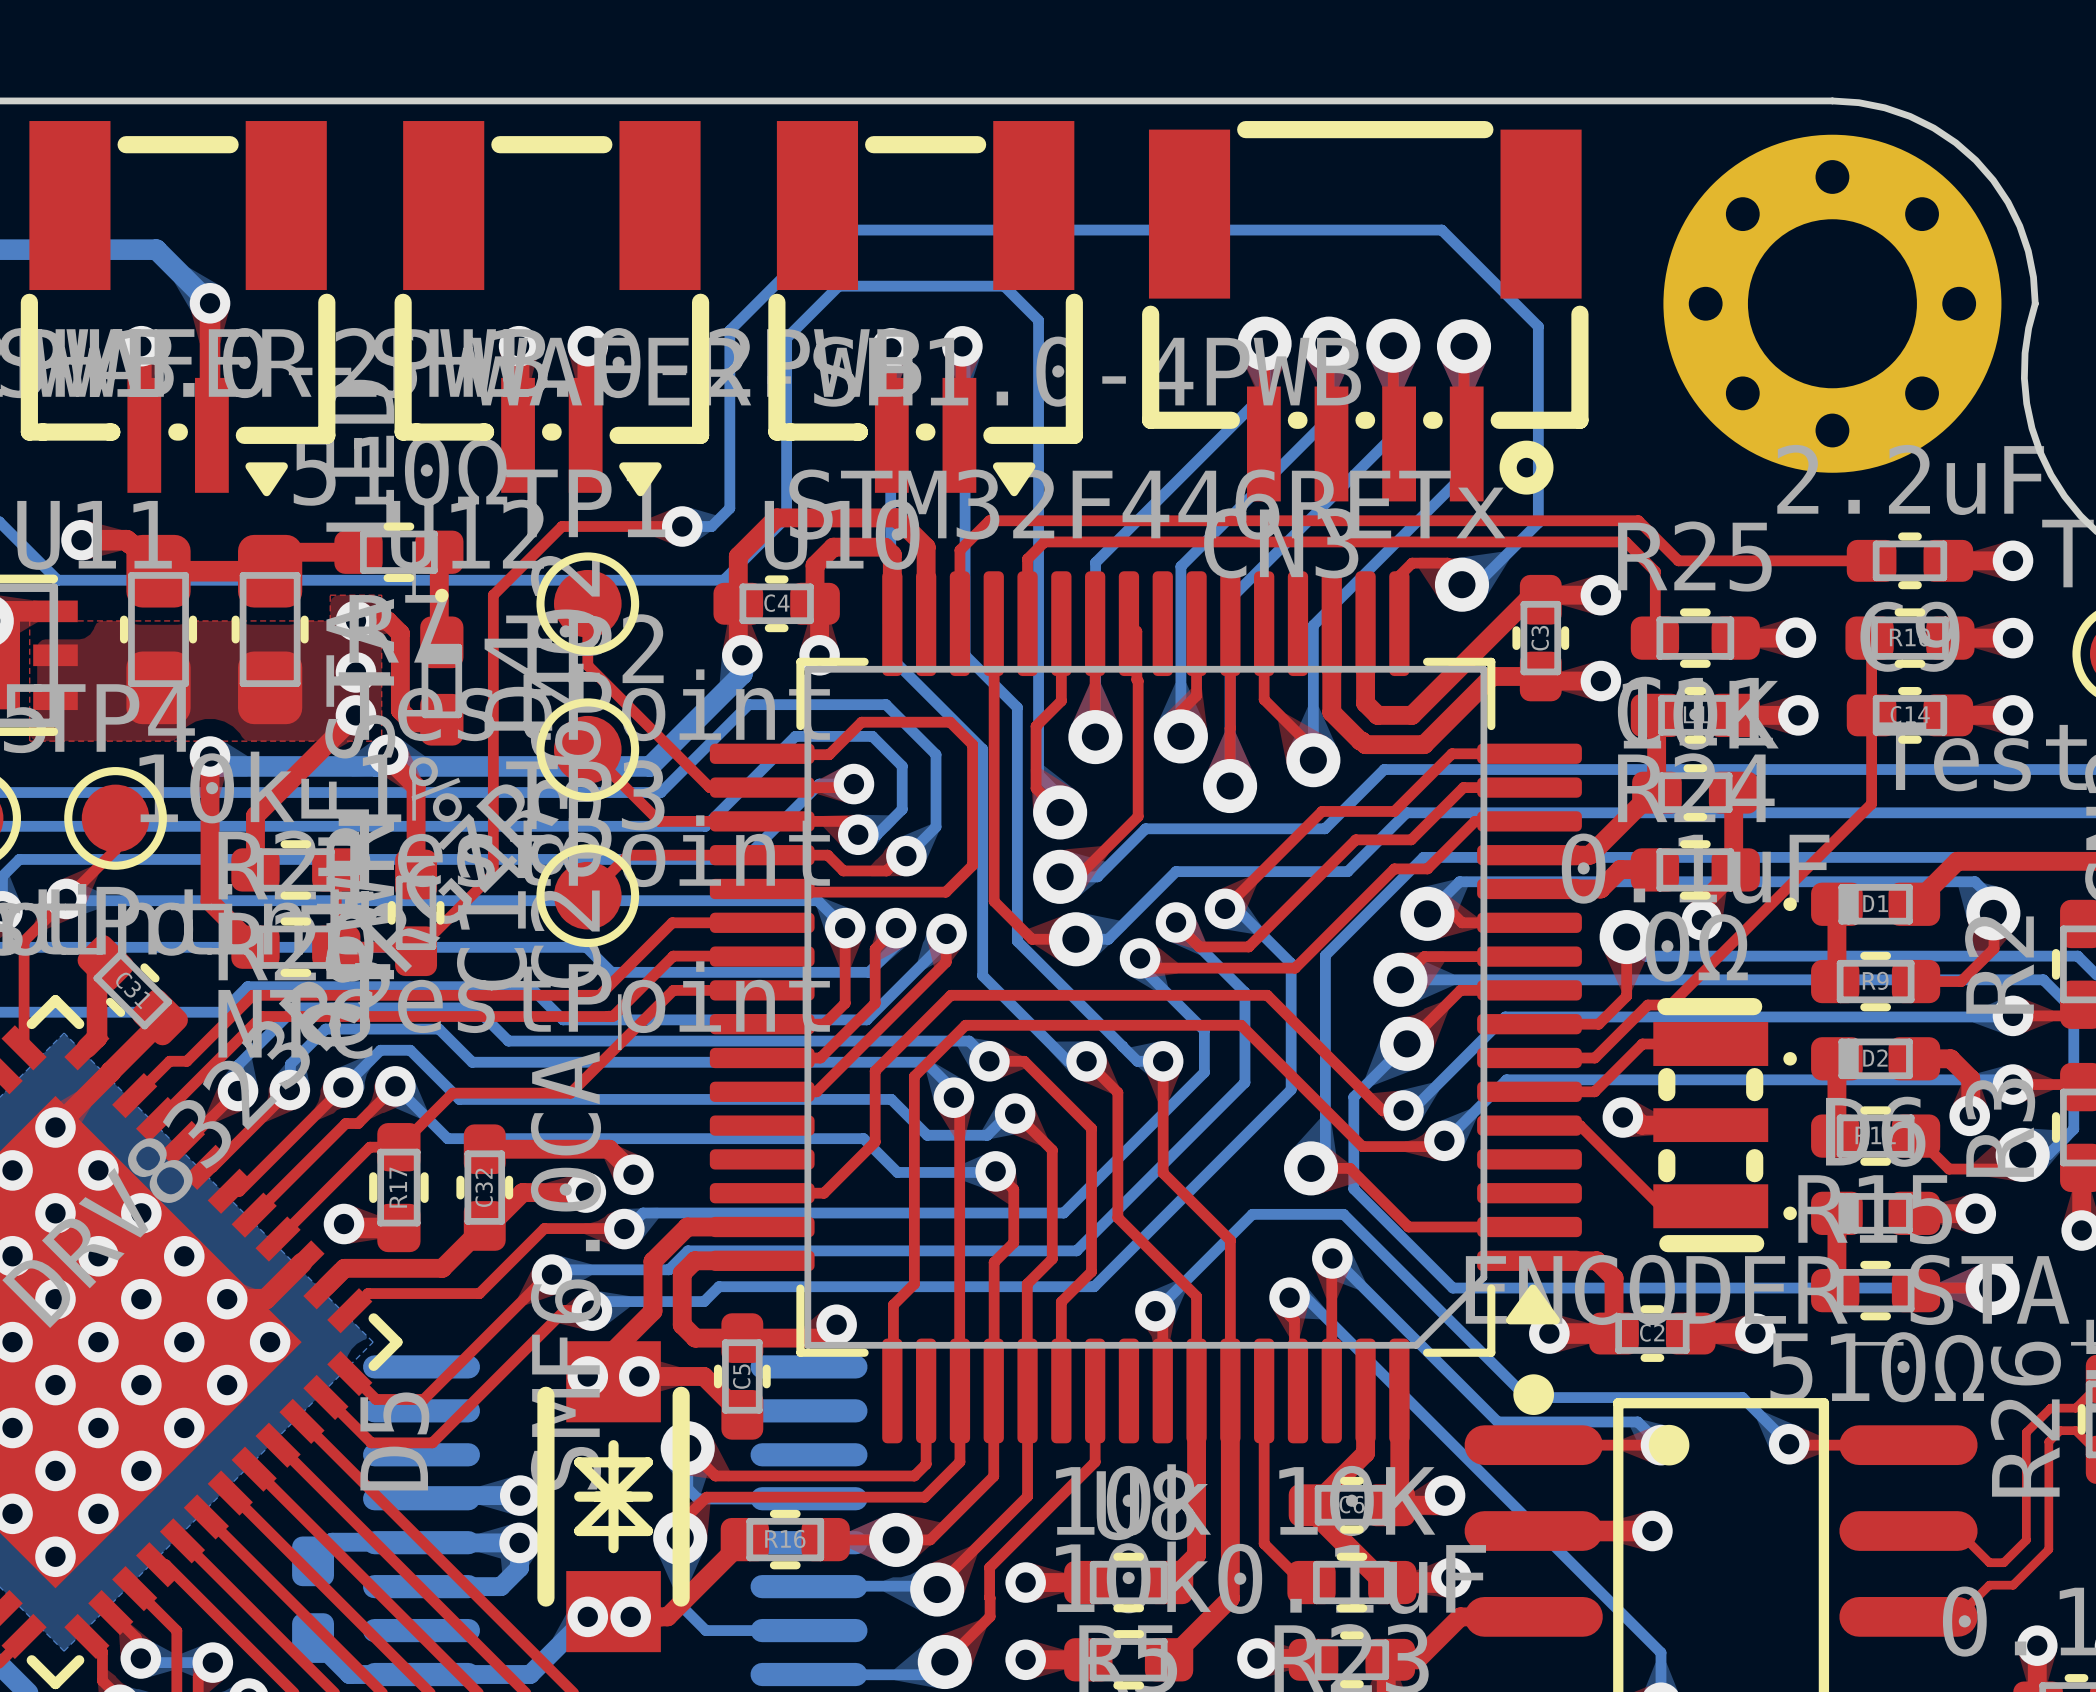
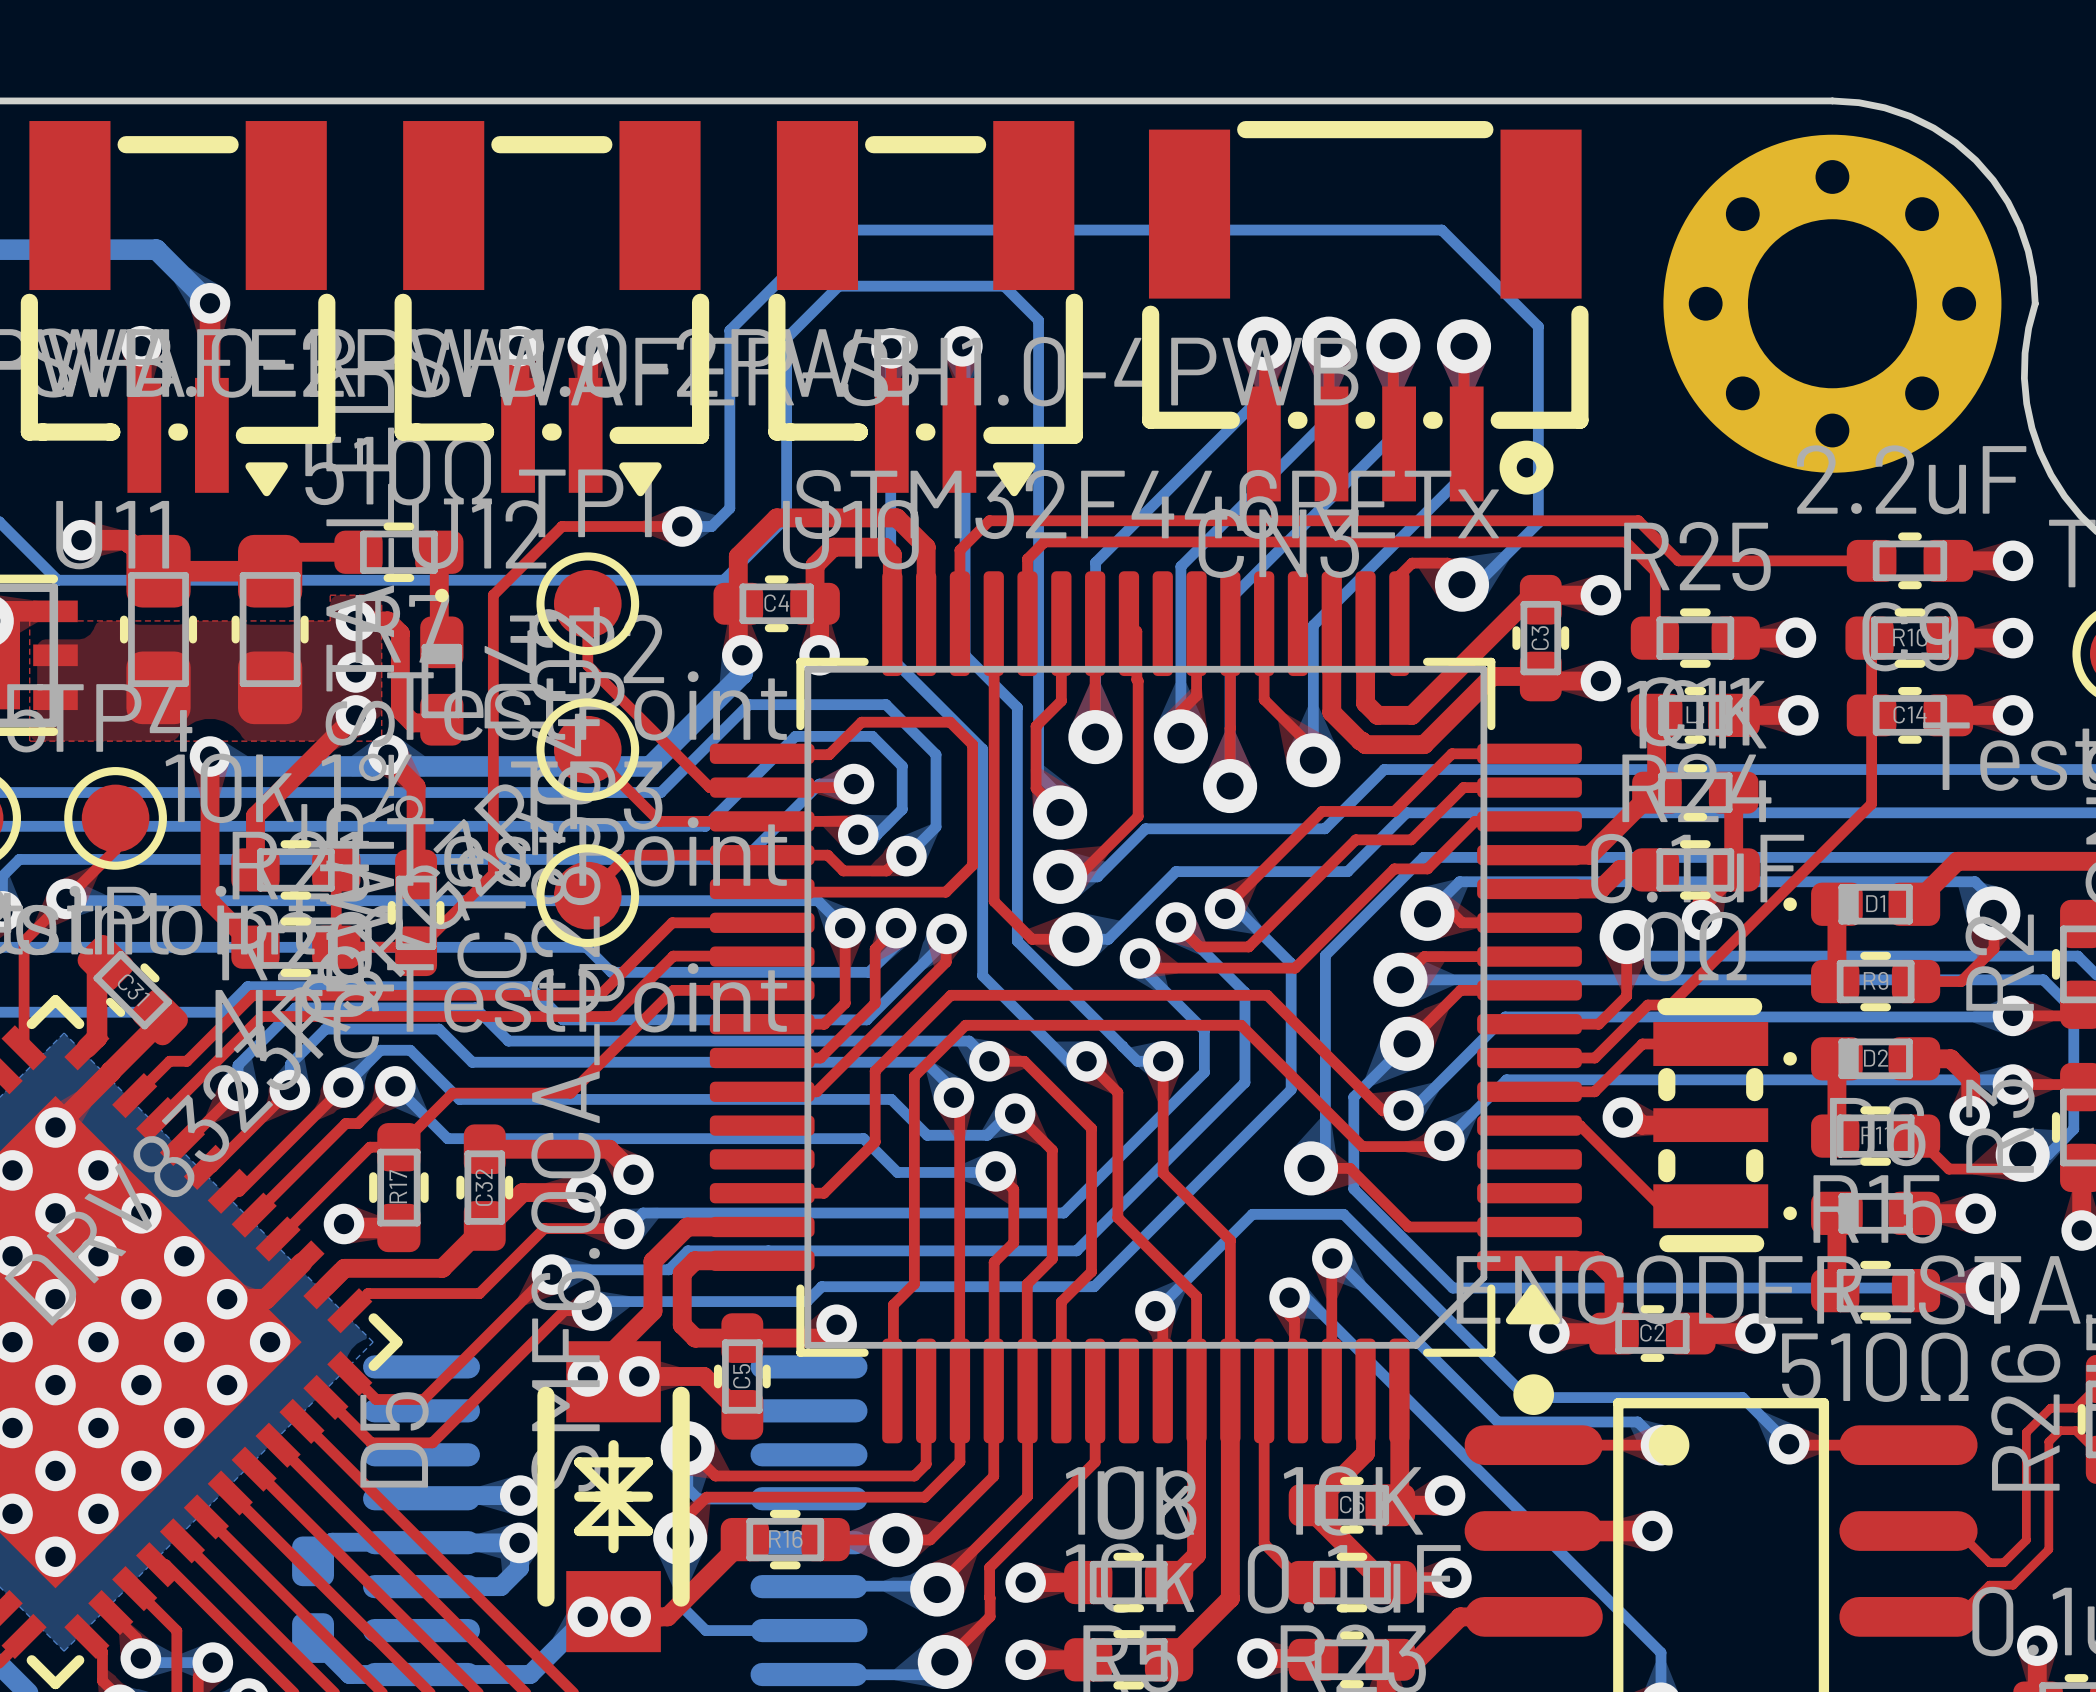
bottom track: (821, 1286) (719, 1286) (704, 1301) -> (821, 1286) (806, 1301) (704, 1301)

